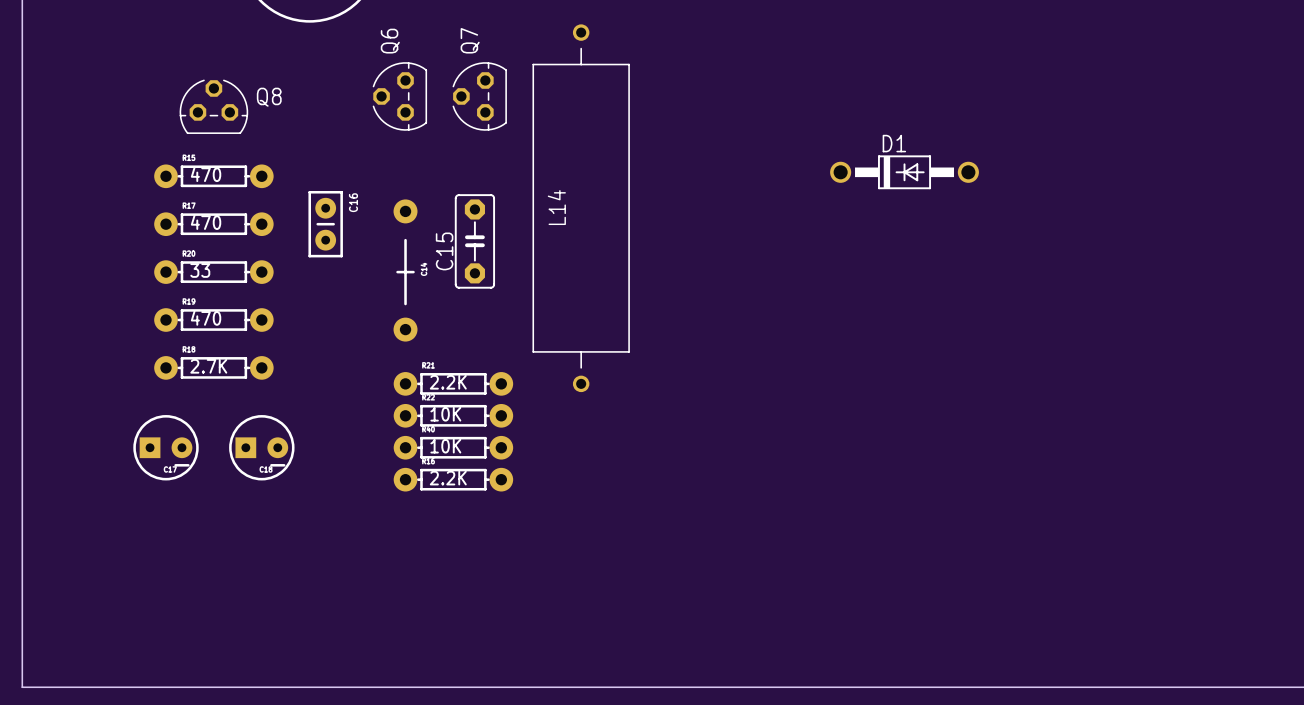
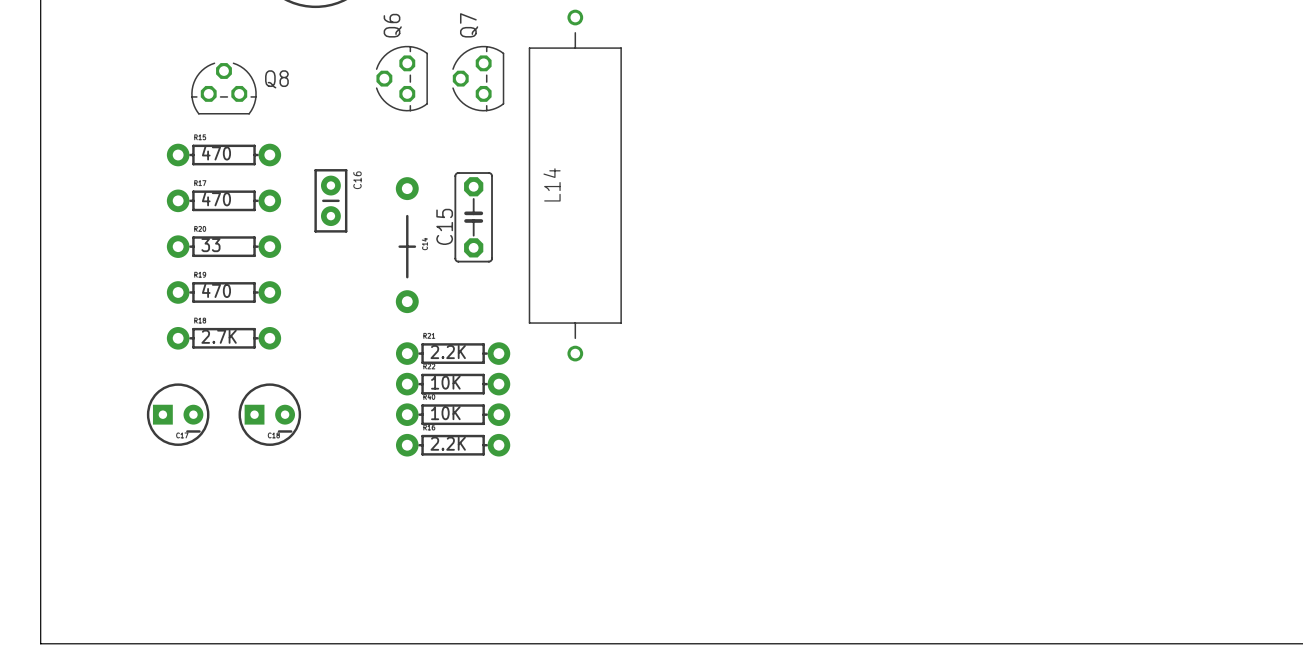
D1: (904, 172) -> none

